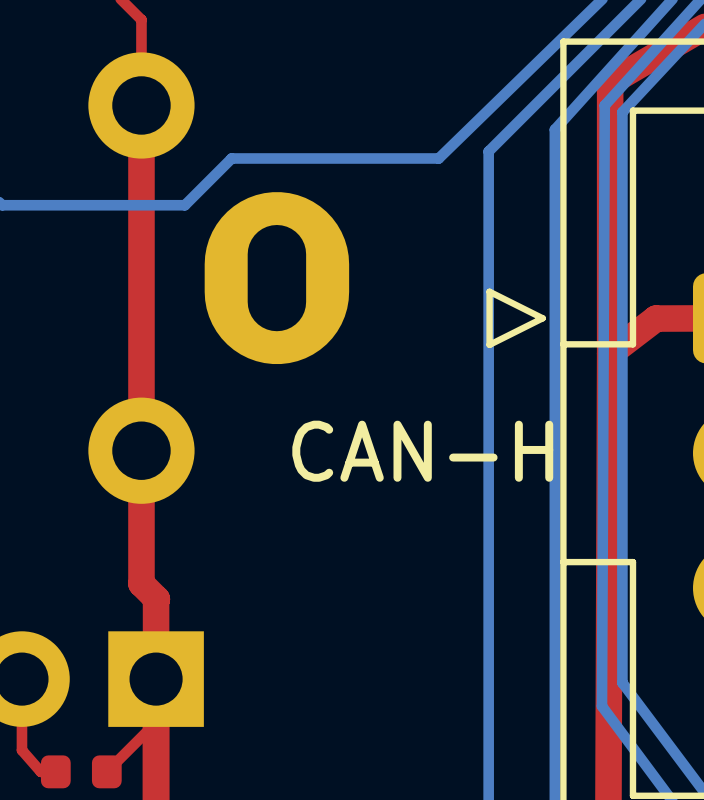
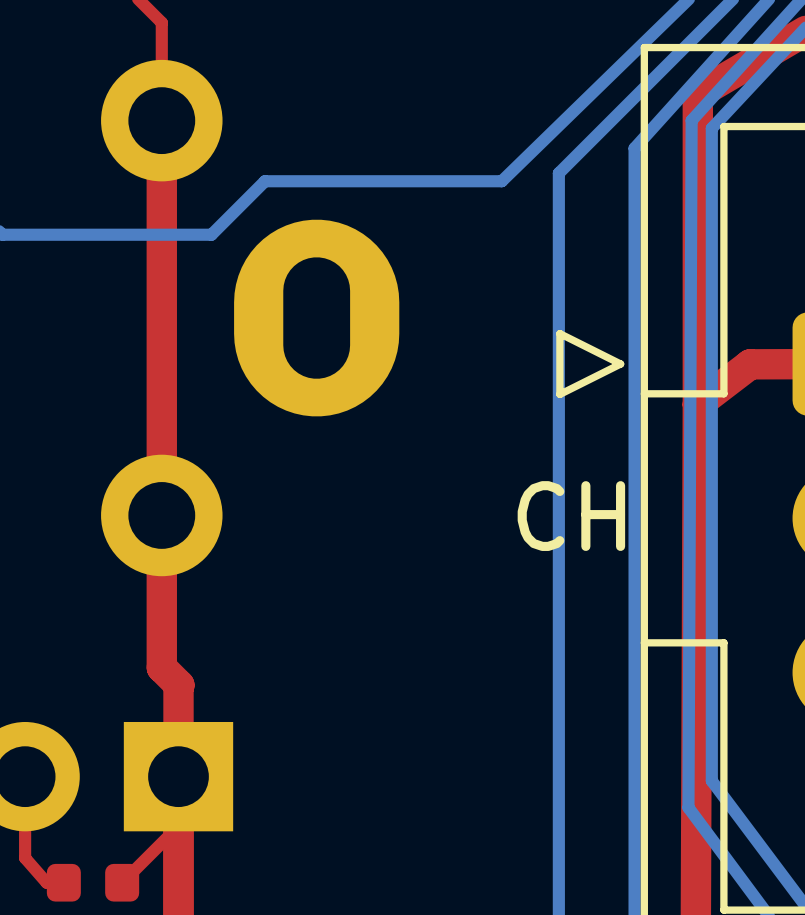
text: CAN-H (422, 451) -> none
text: none -> CH (571, 516)

